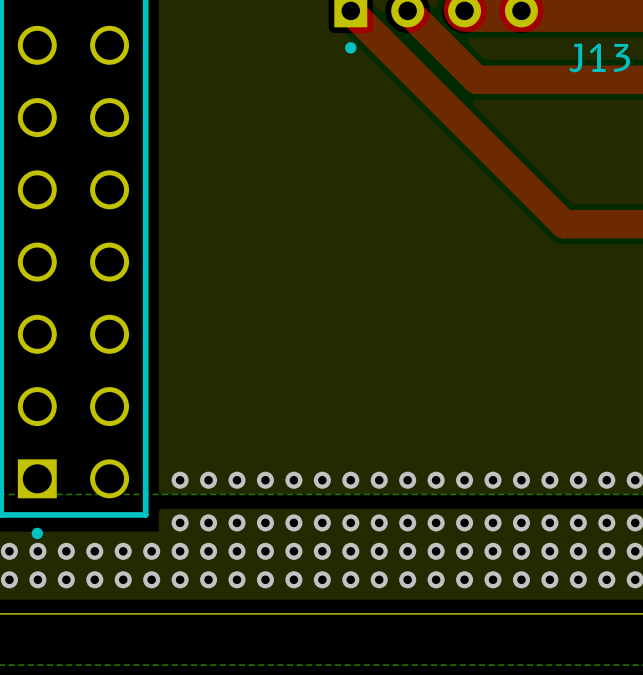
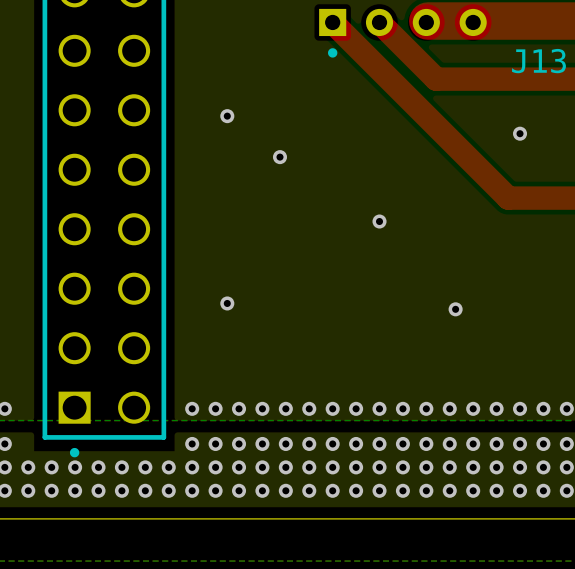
via: none -> (227, 116)
via: none -> (520, 133)
via: none -> (279, 157)
via: none -> (379, 221)
via: none -> (227, 303)
via: none -> (455, 309)

